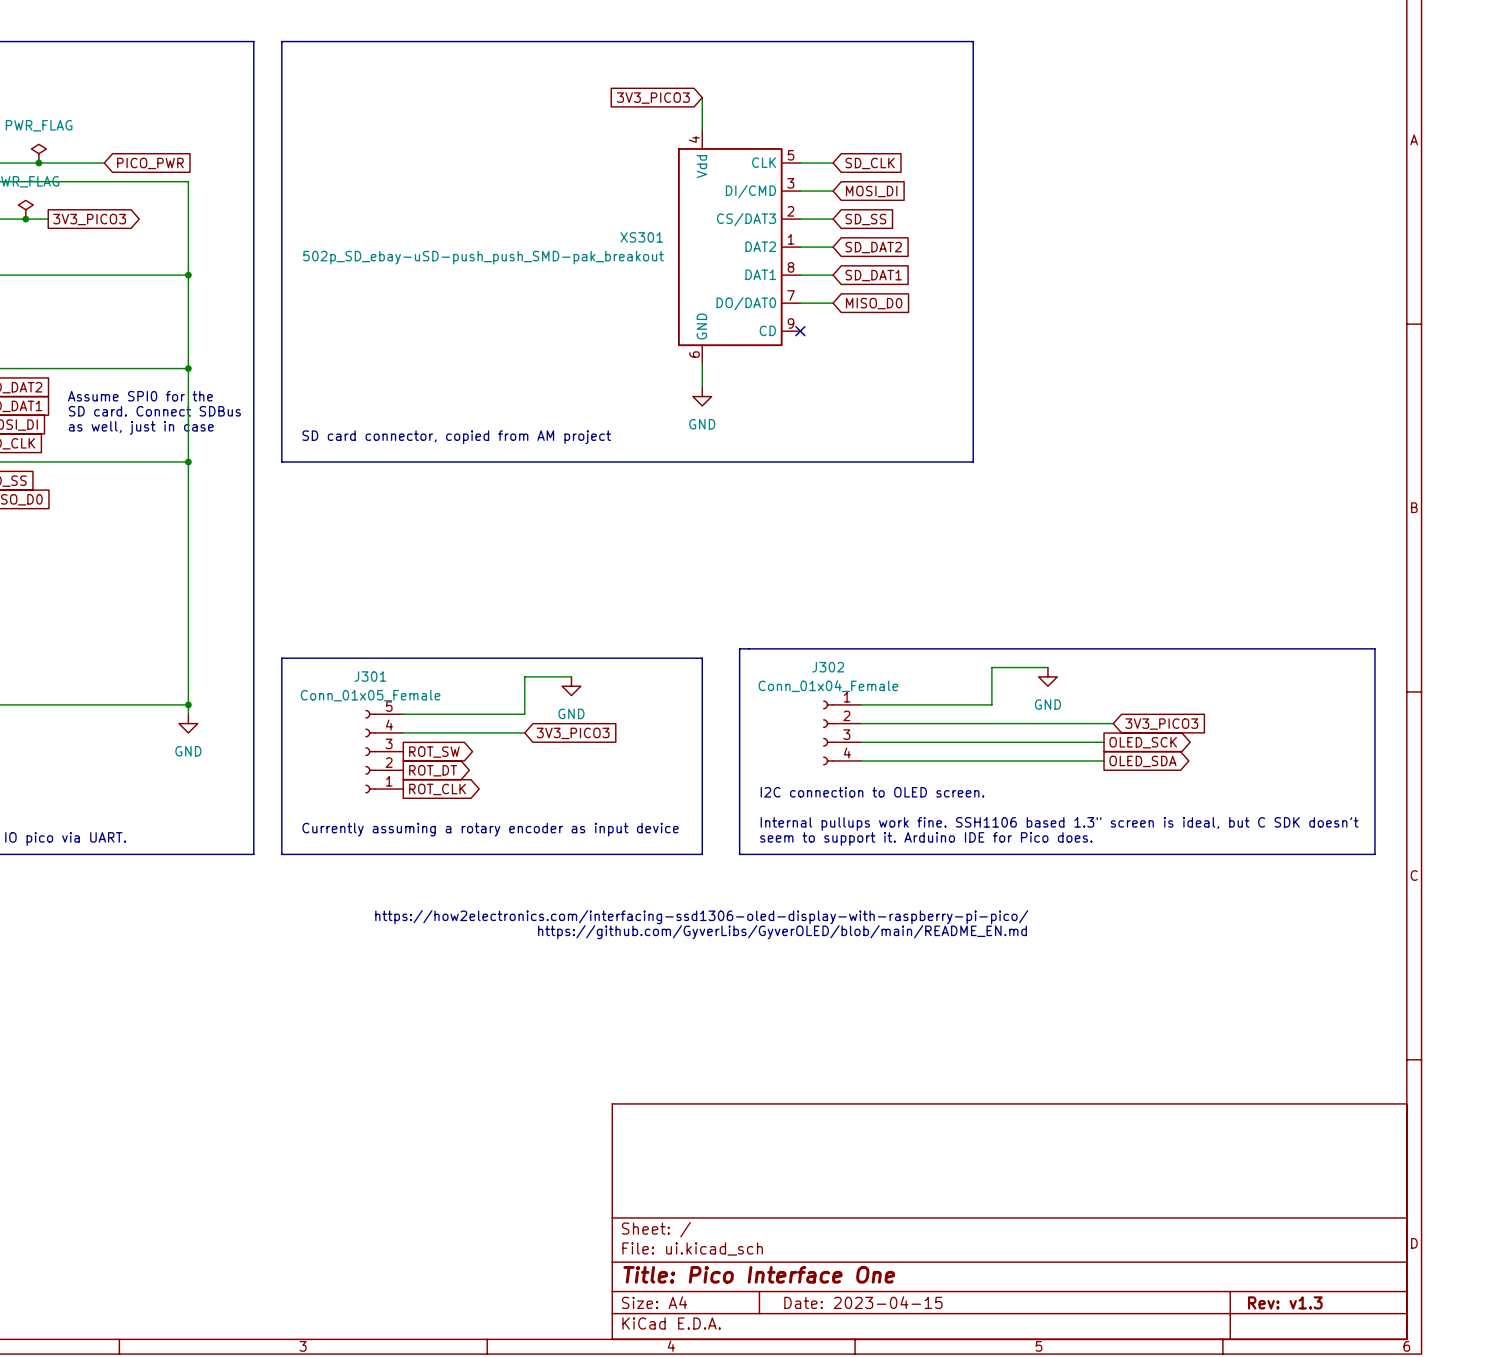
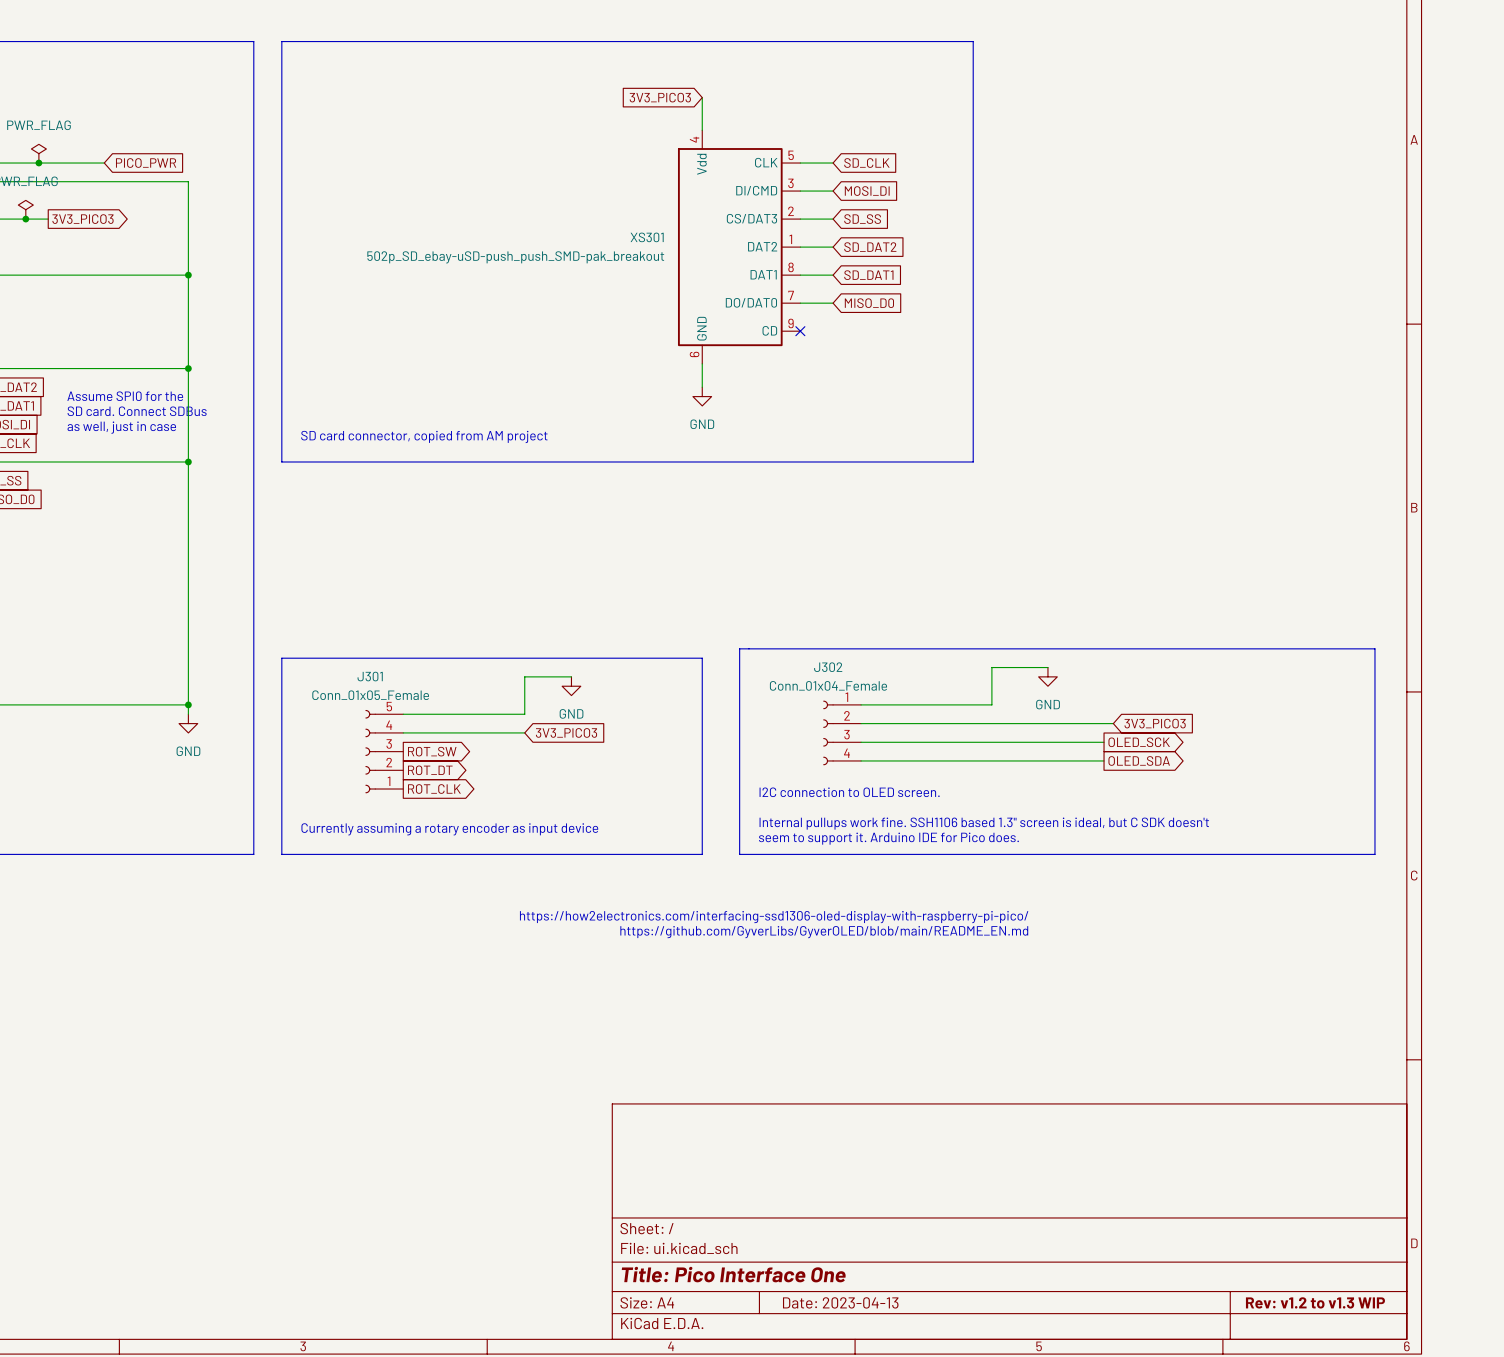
title block: Date: 2023-04-15 (863, 1302) -> Date: 2023-04-13 (840, 1302)
title block: Rev: v1.3 (1285, 1302) -> Rev: v1.2 to v1.3 WIP (1315, 1302)

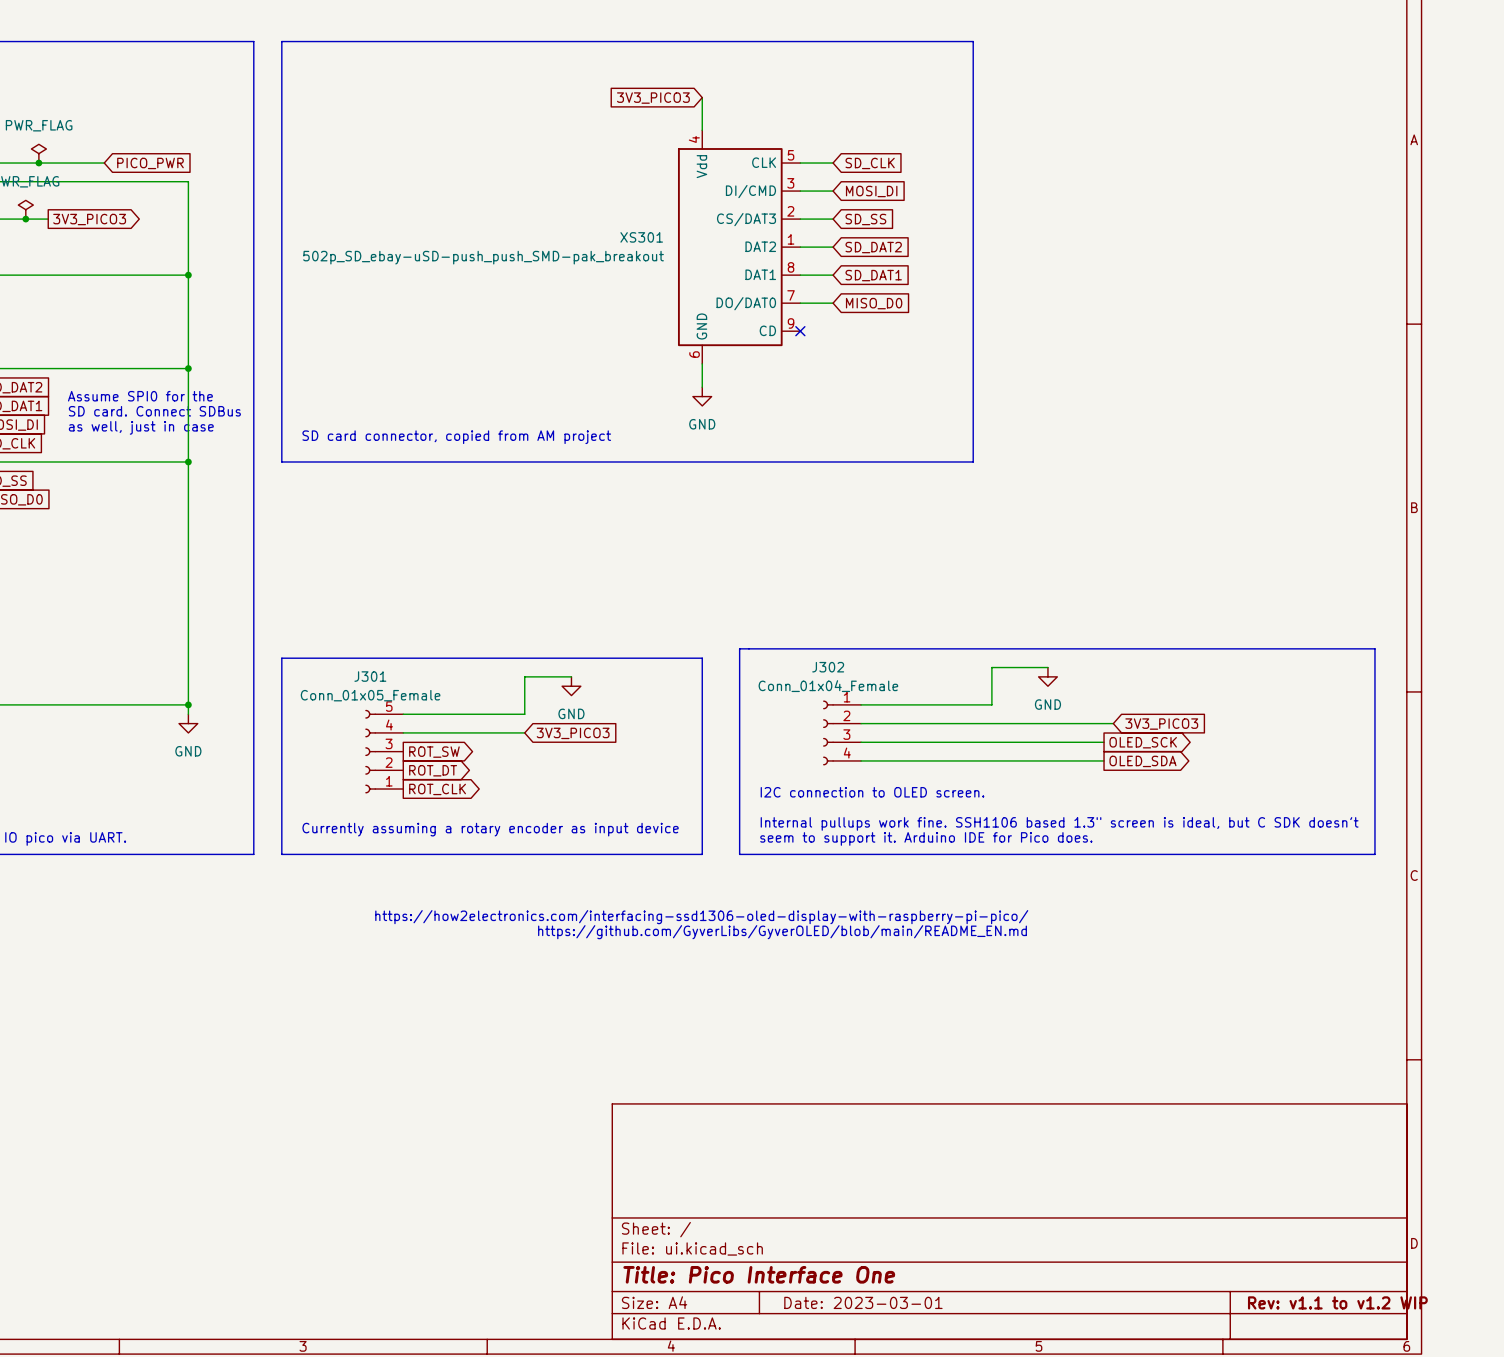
title block: Date: 2023-04-13 (840, 1302) -> Date: 2023-03-01 (863, 1302)
title block: Rev: v1.2 to v1.3 WIP (1315, 1302) -> Rev: v1.1 to v1.2 WIP (1337, 1302)

